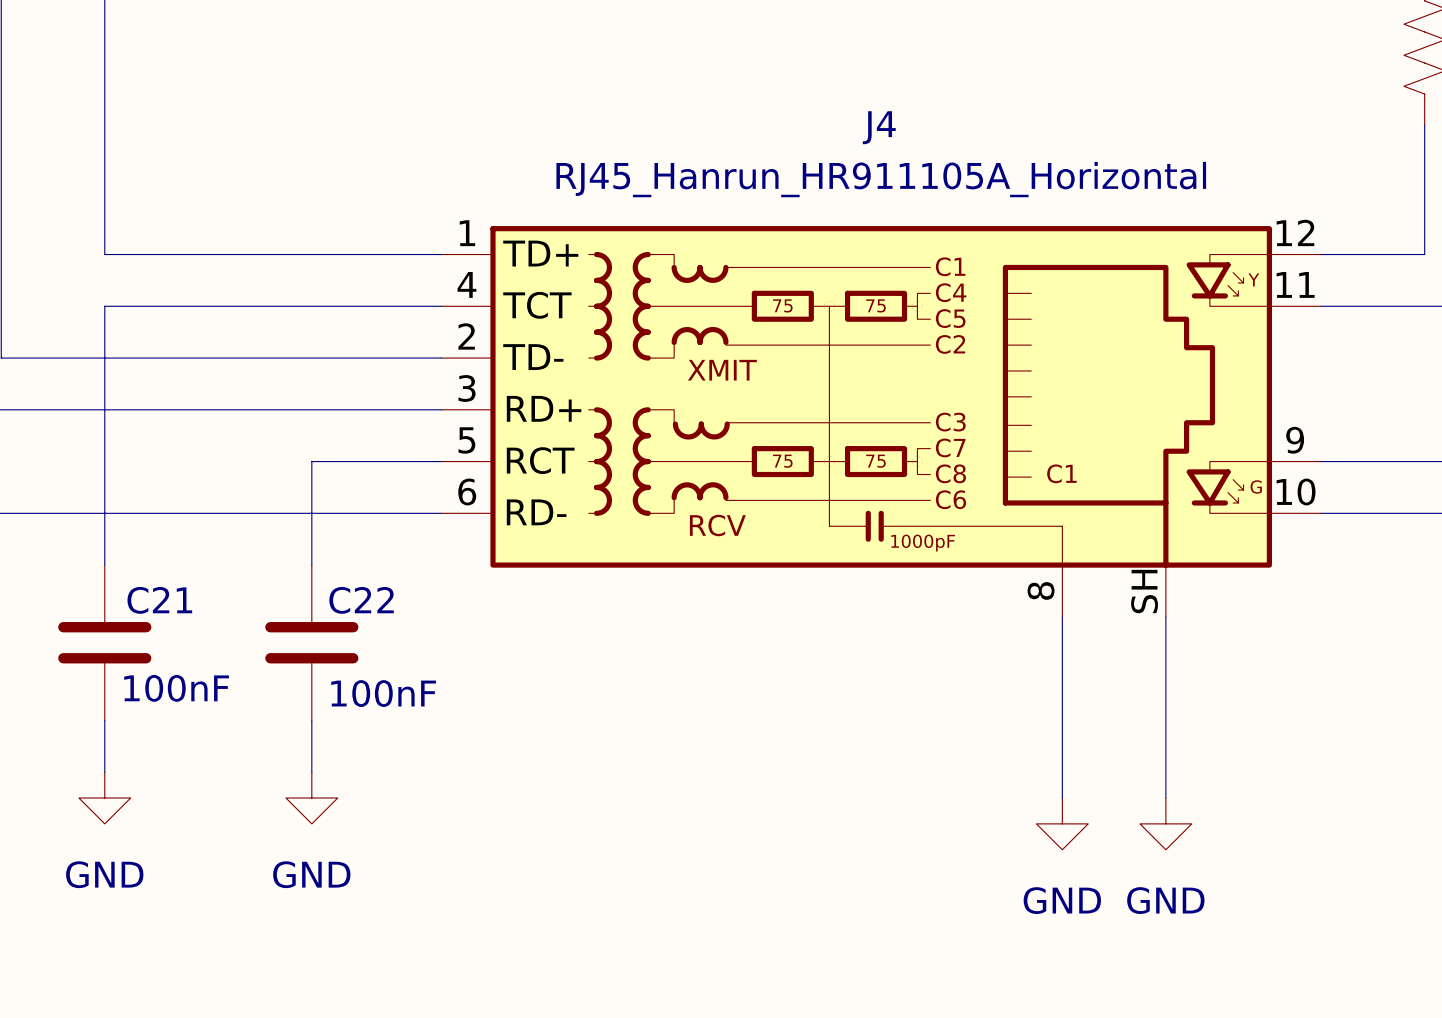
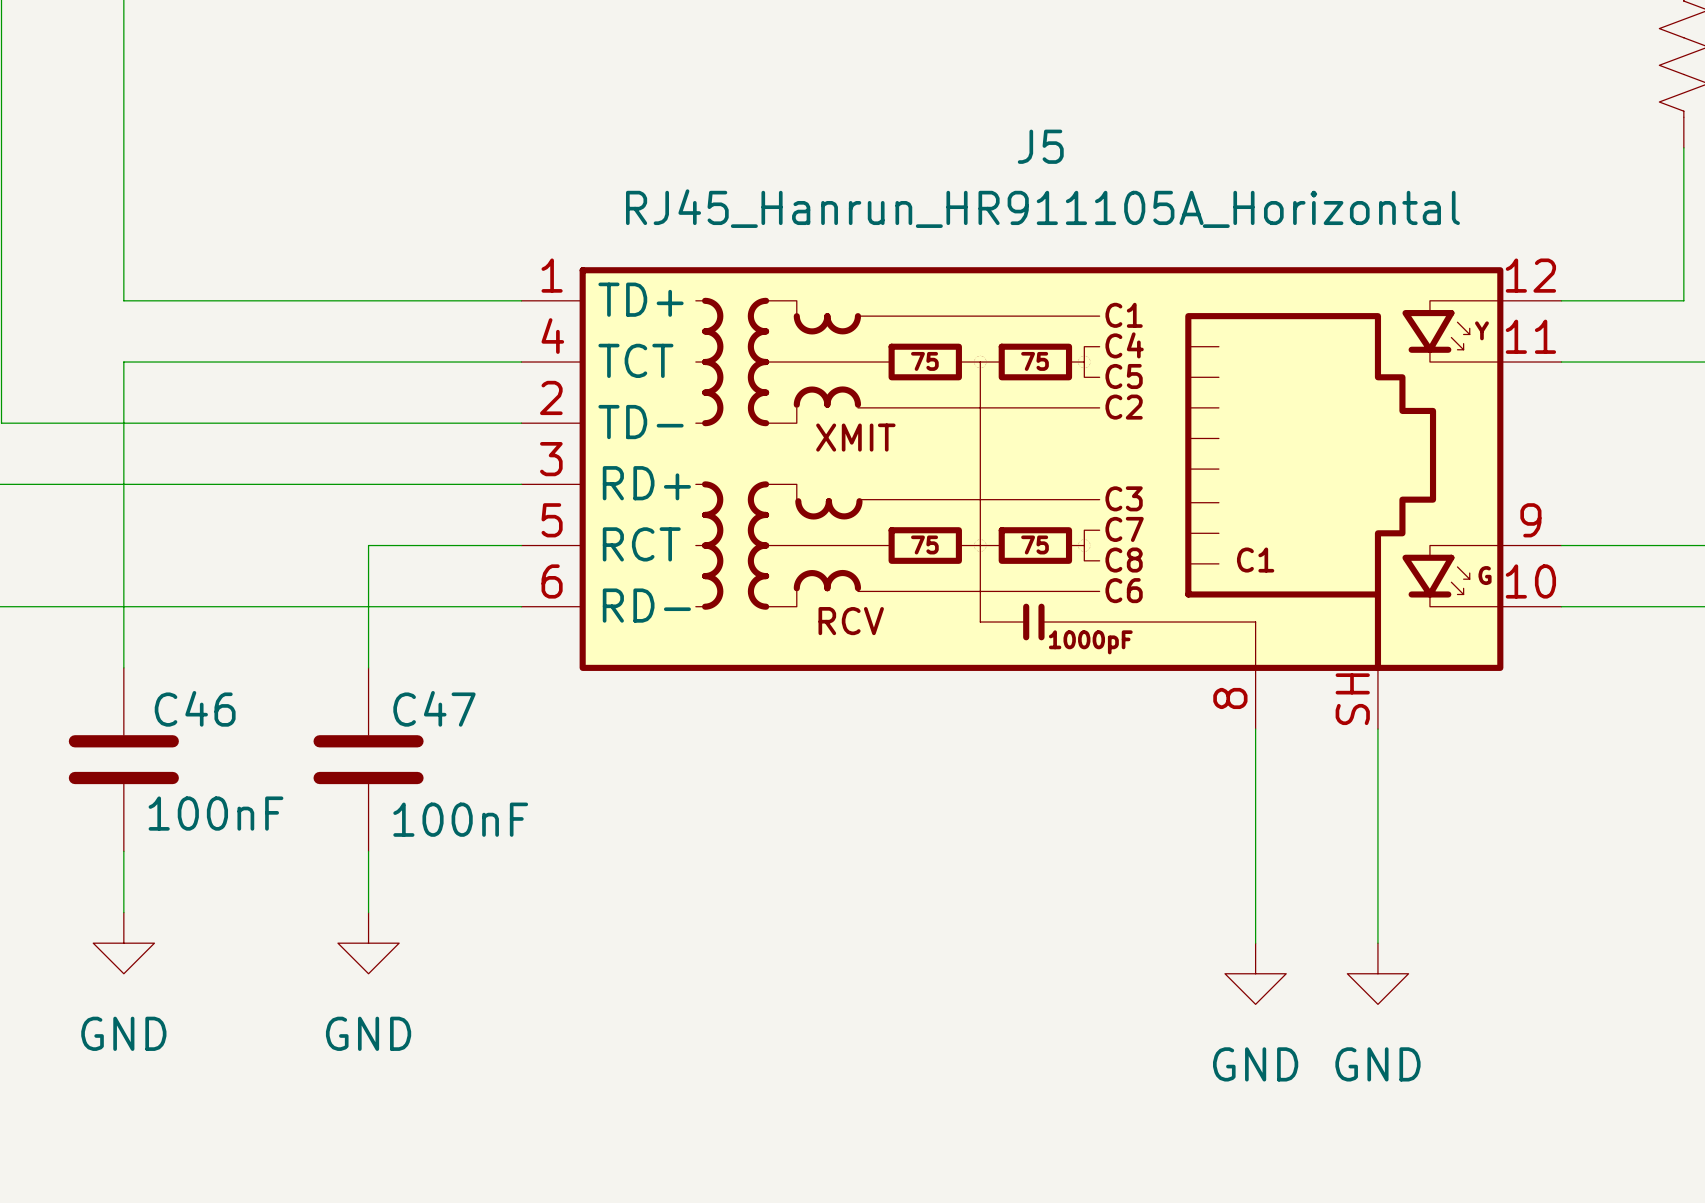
J4 name: J4 (879, 127) -> J5 (1040, 146)
C21 name: C21 (159, 600) -> C46 (195, 708)
C22 name: C22 (361, 600) -> C47 (434, 708)

